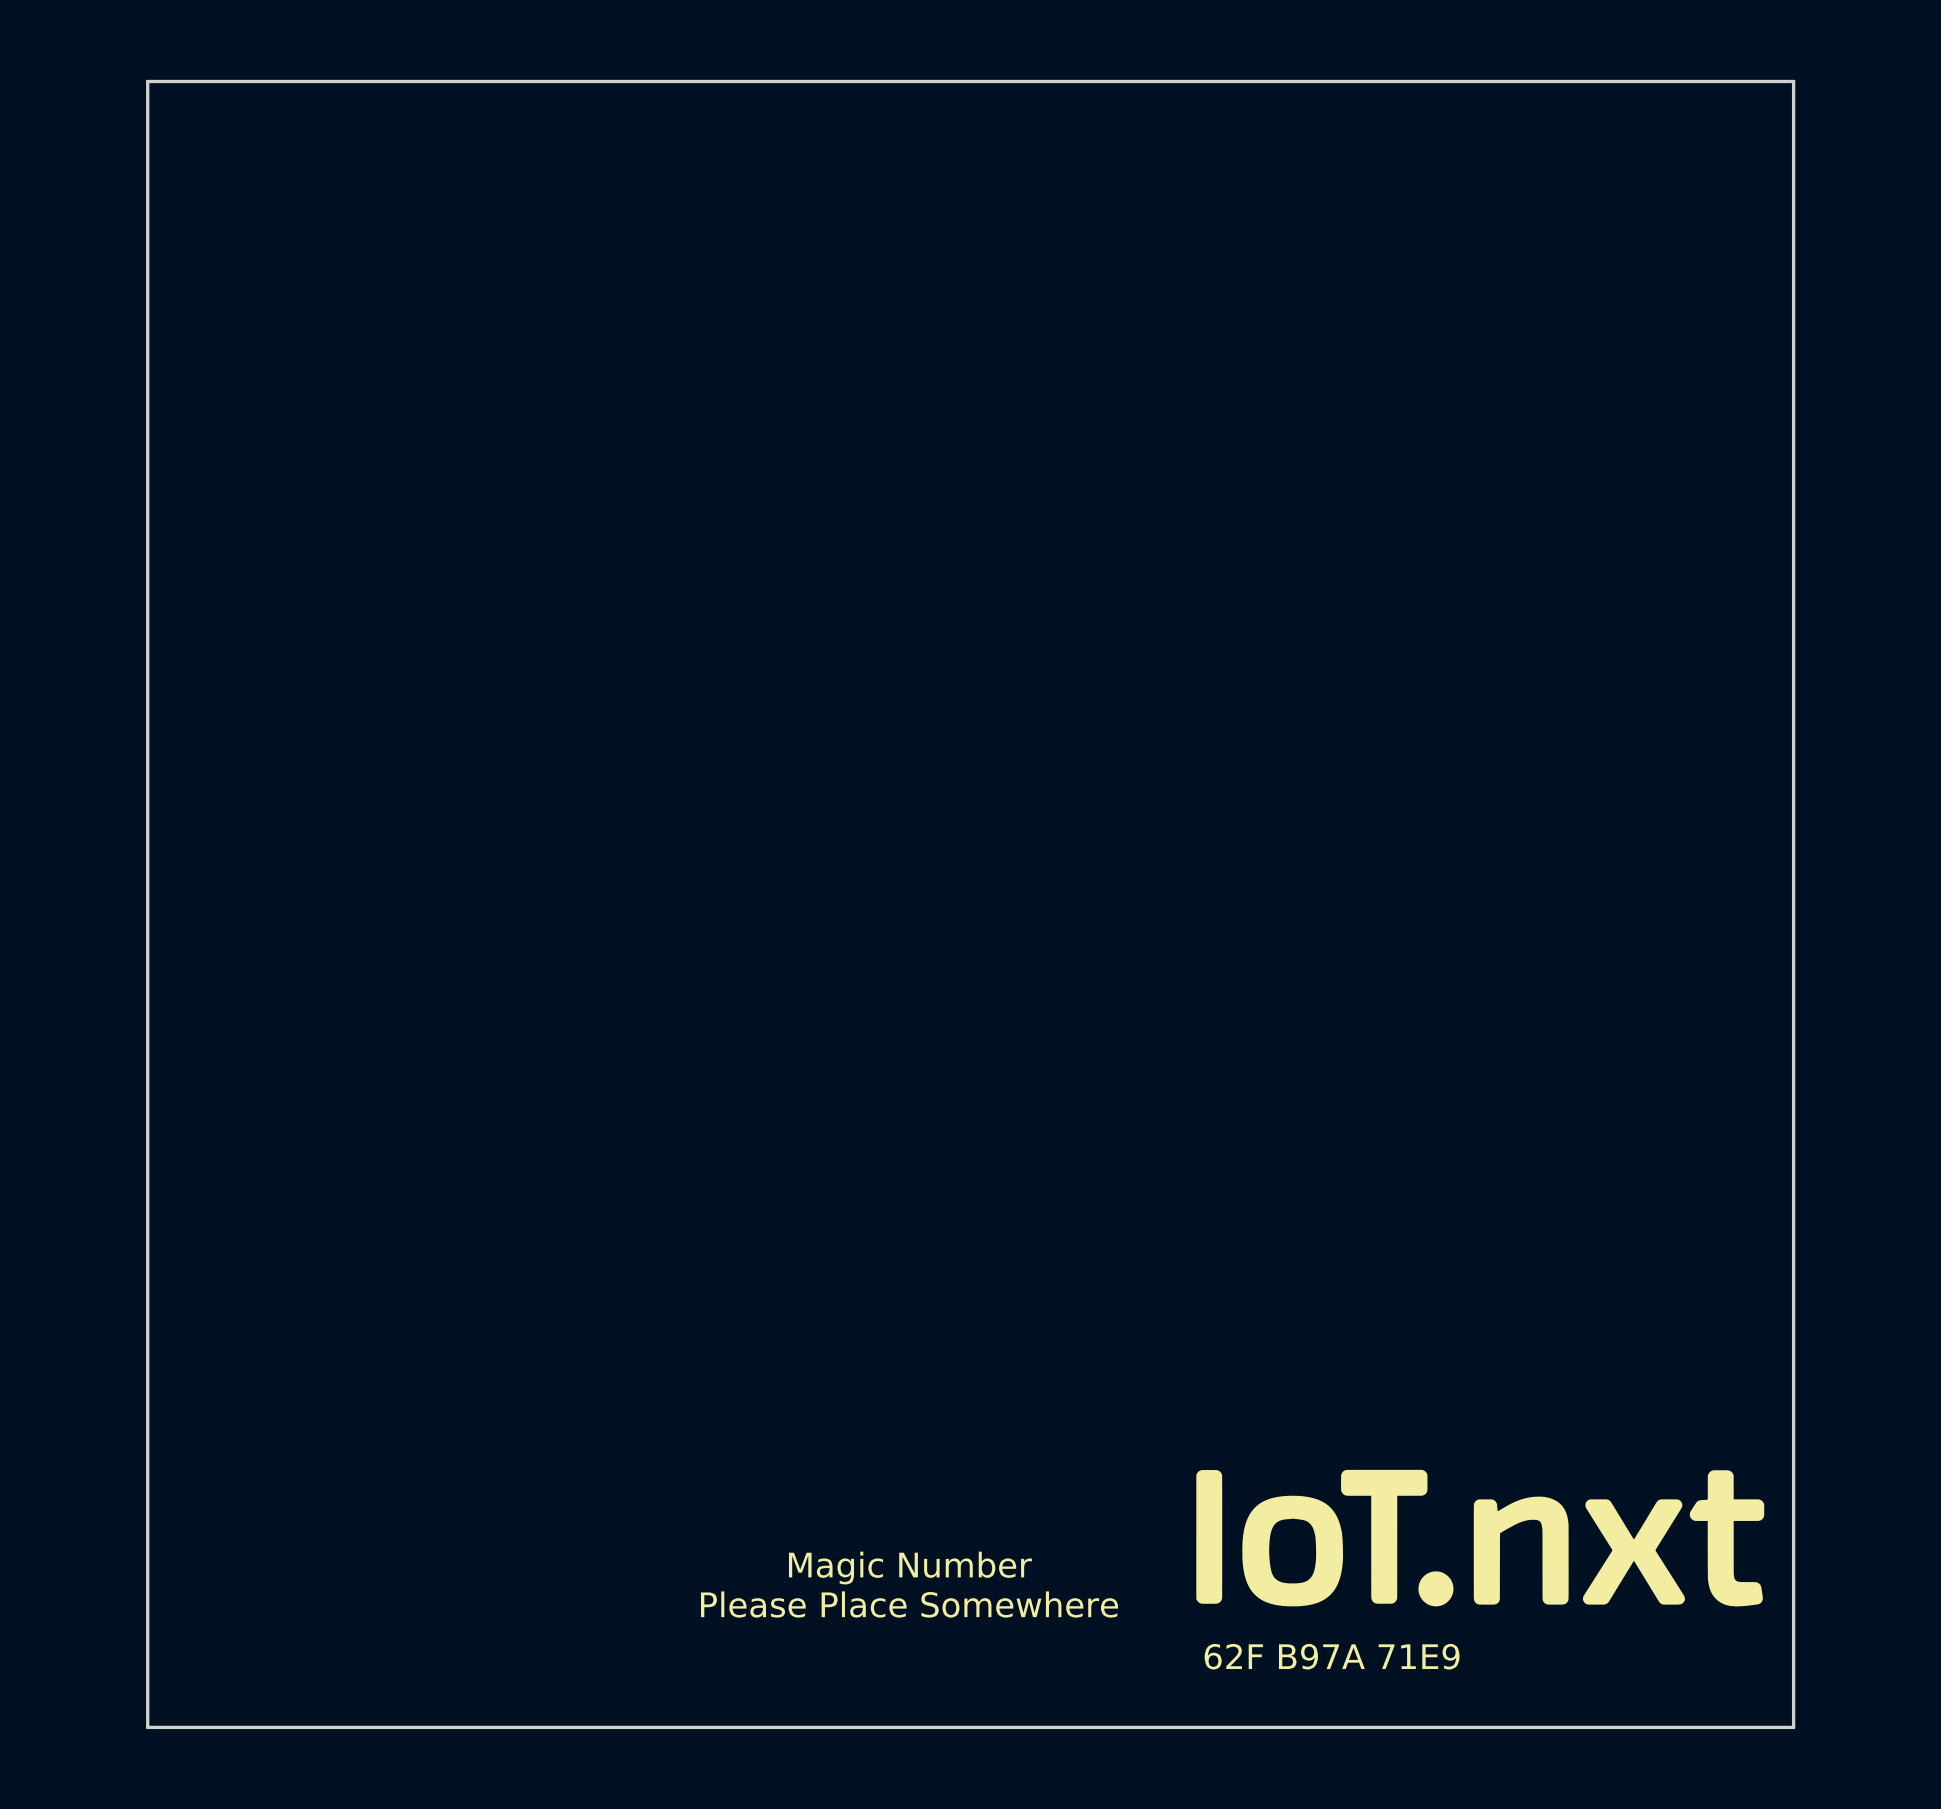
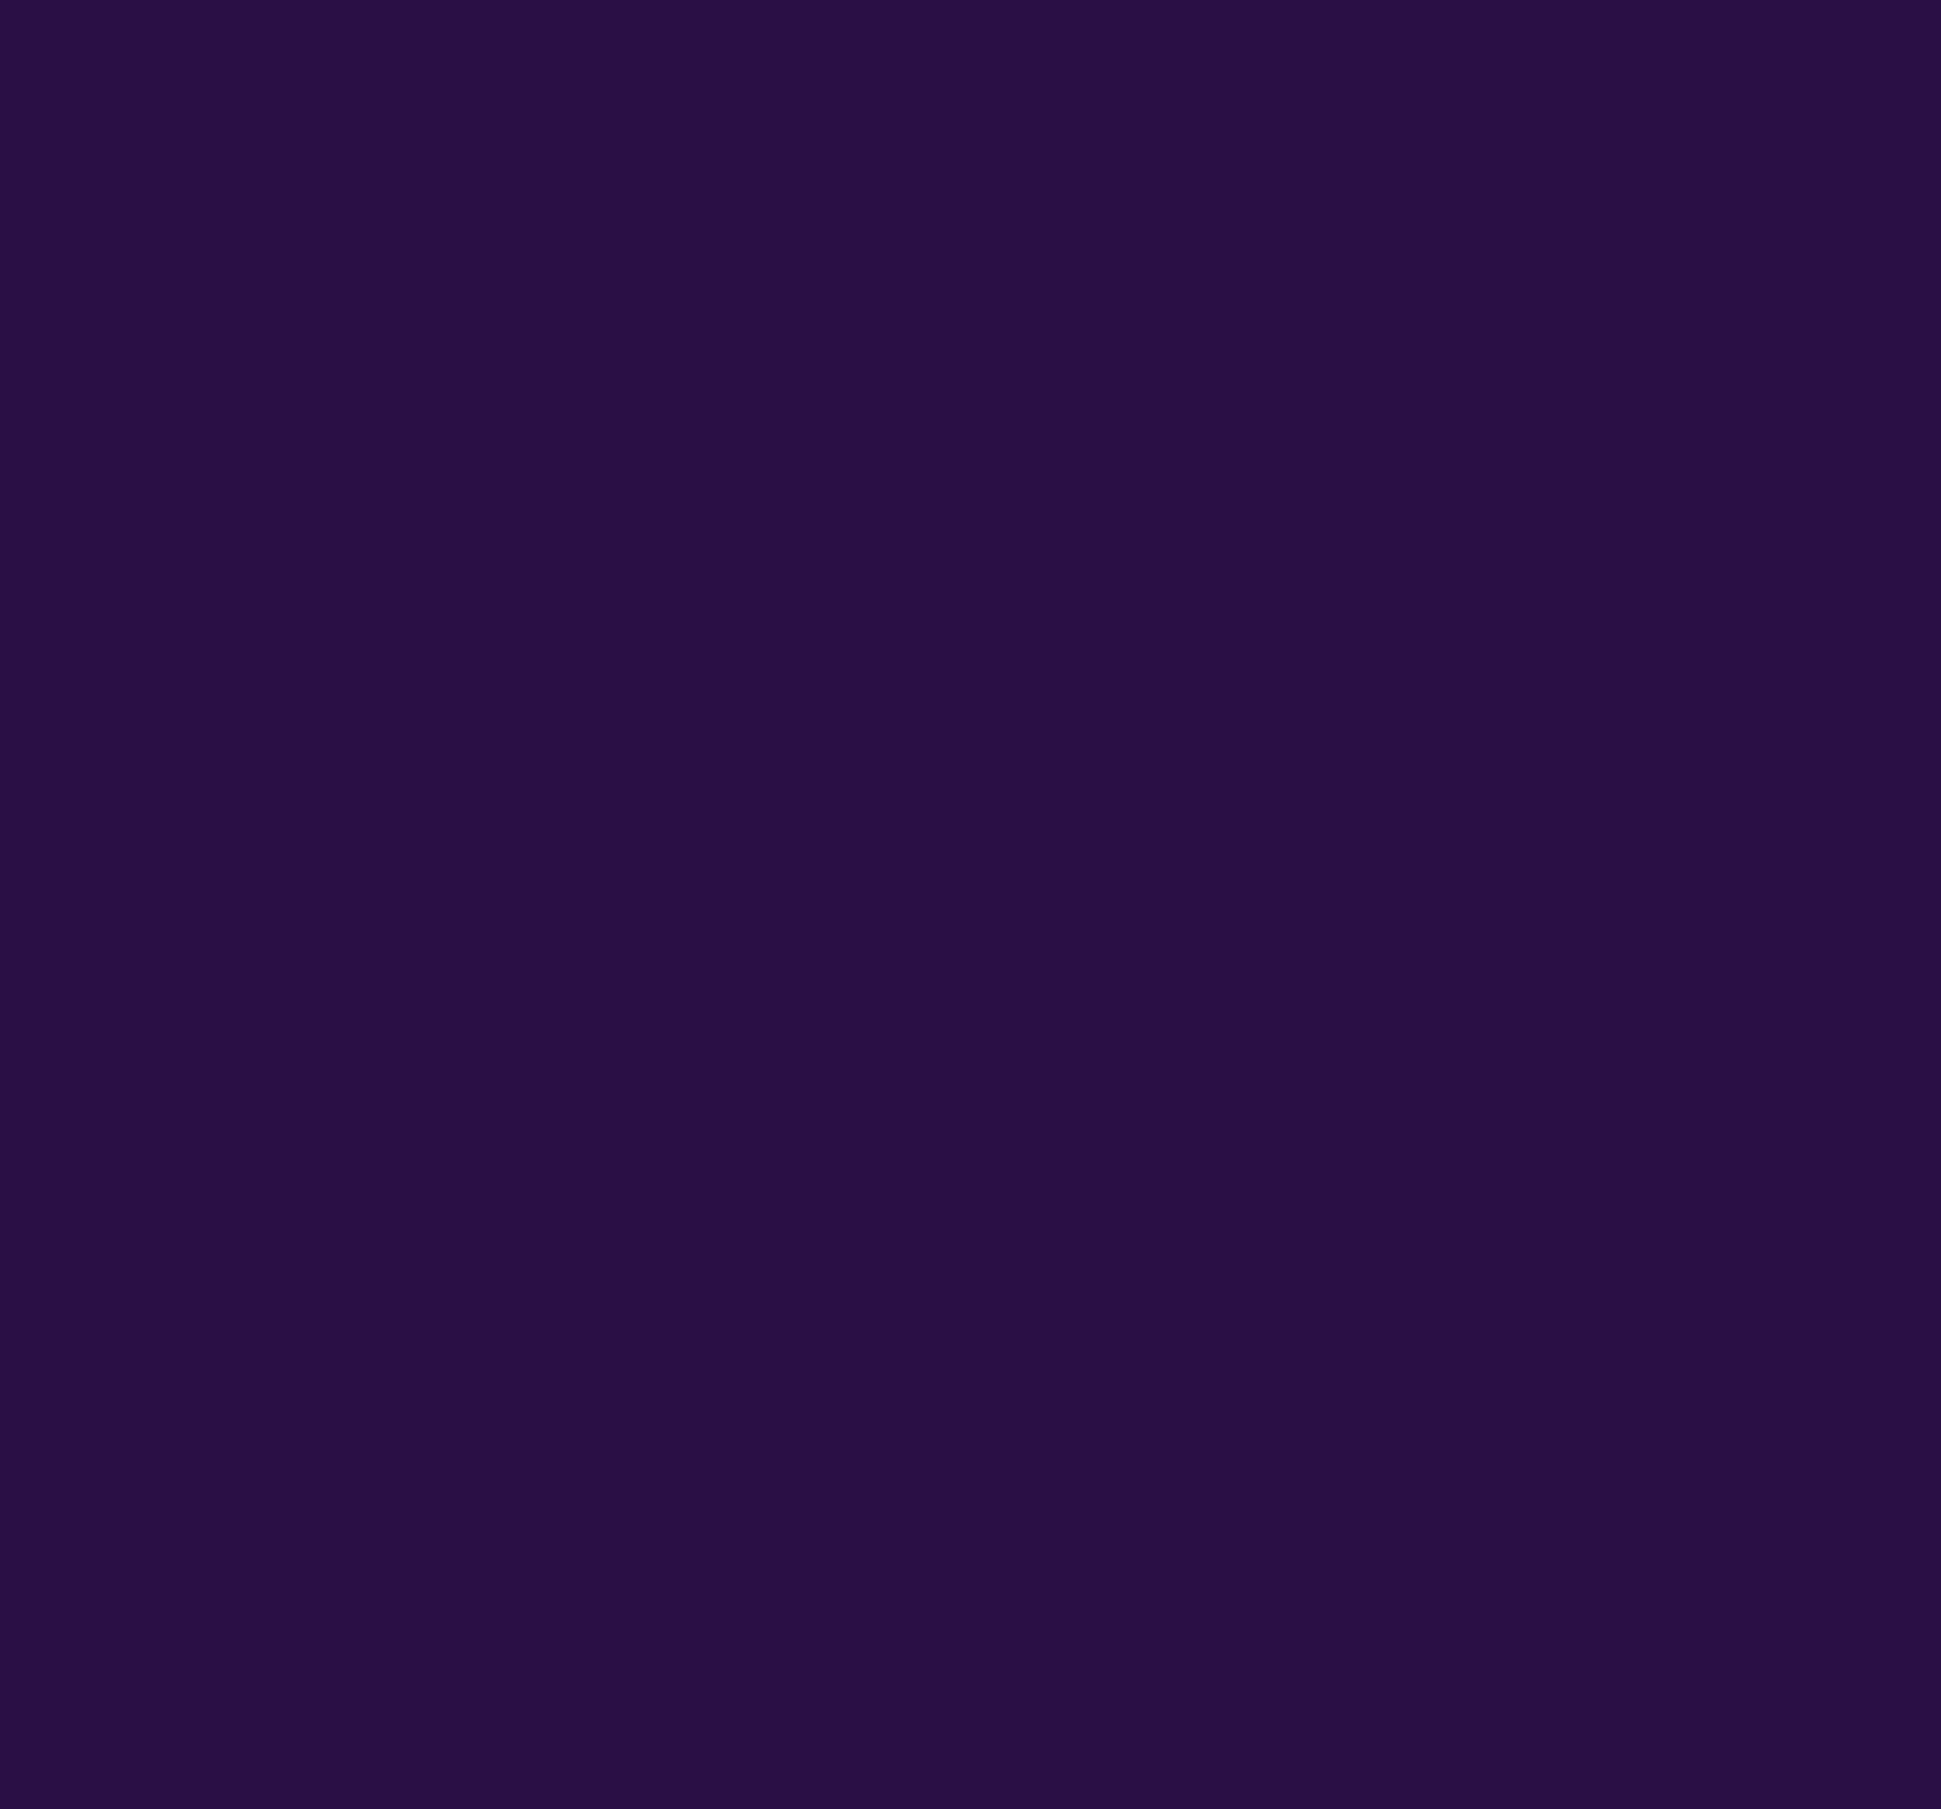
board edge: (147, 81) (1793, 81) (1793, 1727) (147, 1727) (147, 81) -> none
drawing: [1196, 1469, 1765, 1607] -> none
text: Magic Number (910, 1568) -> none
text: Please Place Somewhere (909, 1604) -> none
text: 62F B97A 71E9 (1332, 1656) -> none

